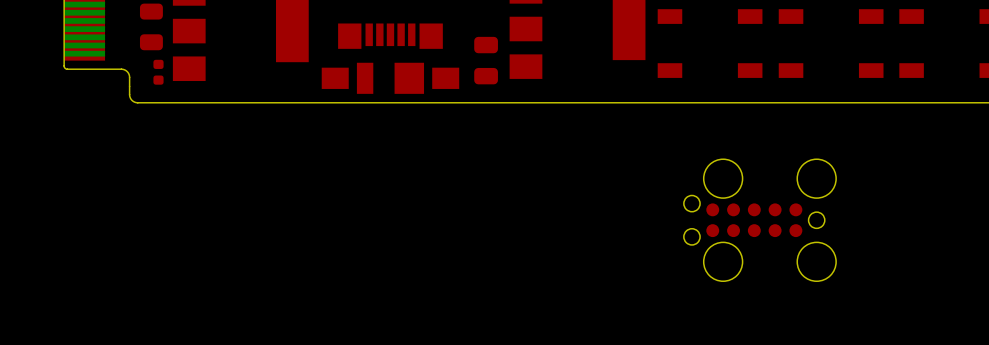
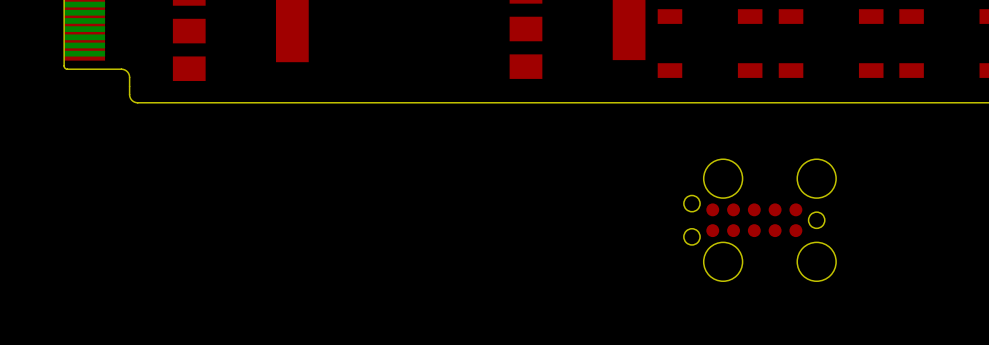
part: (151, 26) -> none
part: (390, 58) -> none
part: (486, 60) -> none
part: (158, 72) -> none

